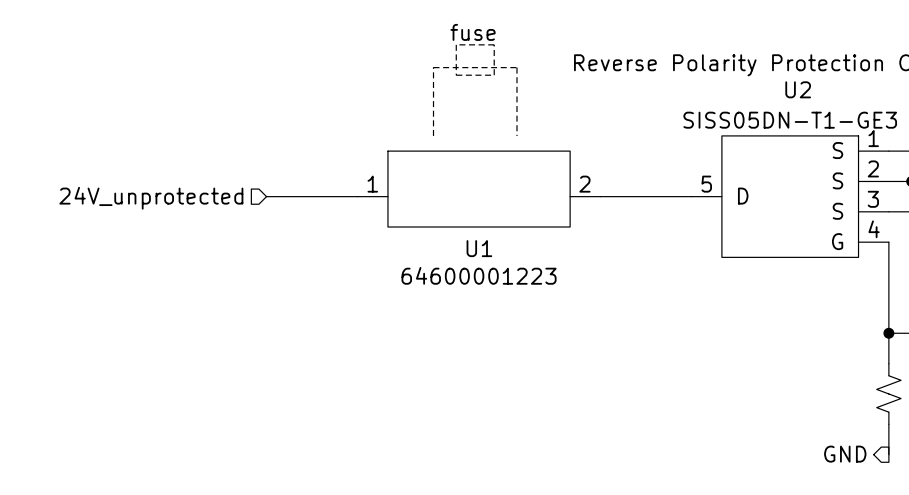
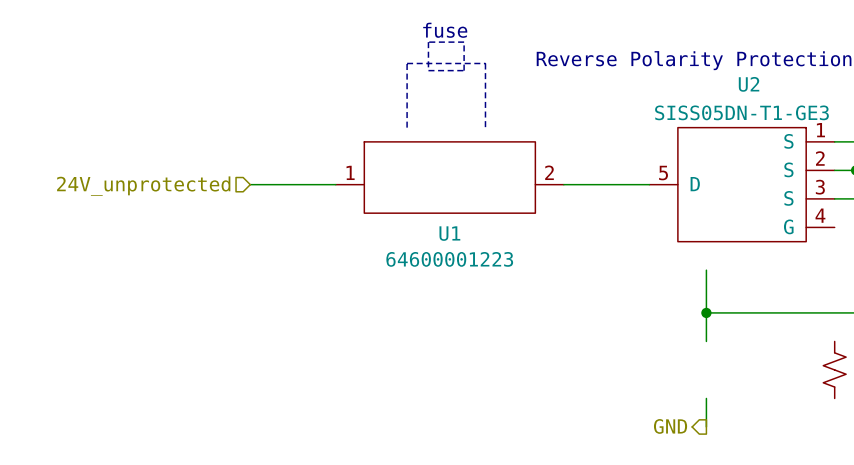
wire: (888, 242) (888, 363) -> none
wire: none -> (706, 270) (706, 341)
wire: none -> (706, 312) (834, 312)
junction: none -> (706, 312)
junction: (888, 333) -> none
wire: (888, 424) (888, 454) -> (706, 398) (706, 426)
hierarchical label position: GND (845, 454) -> GND (670, 426)

